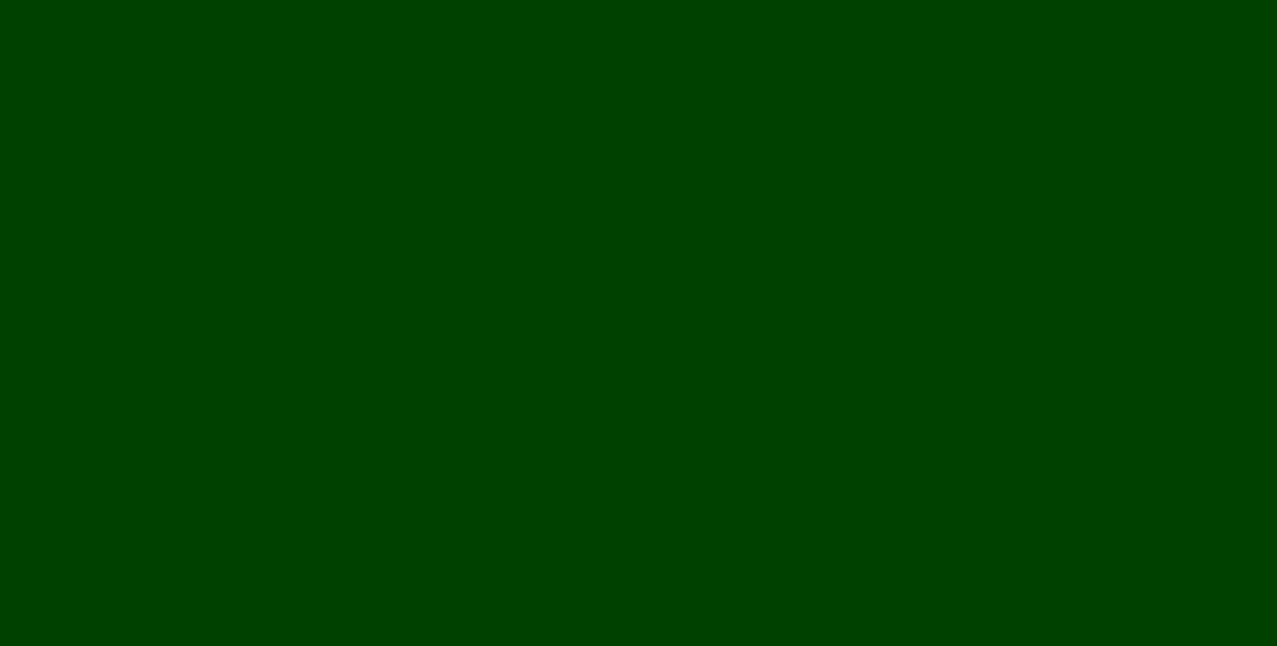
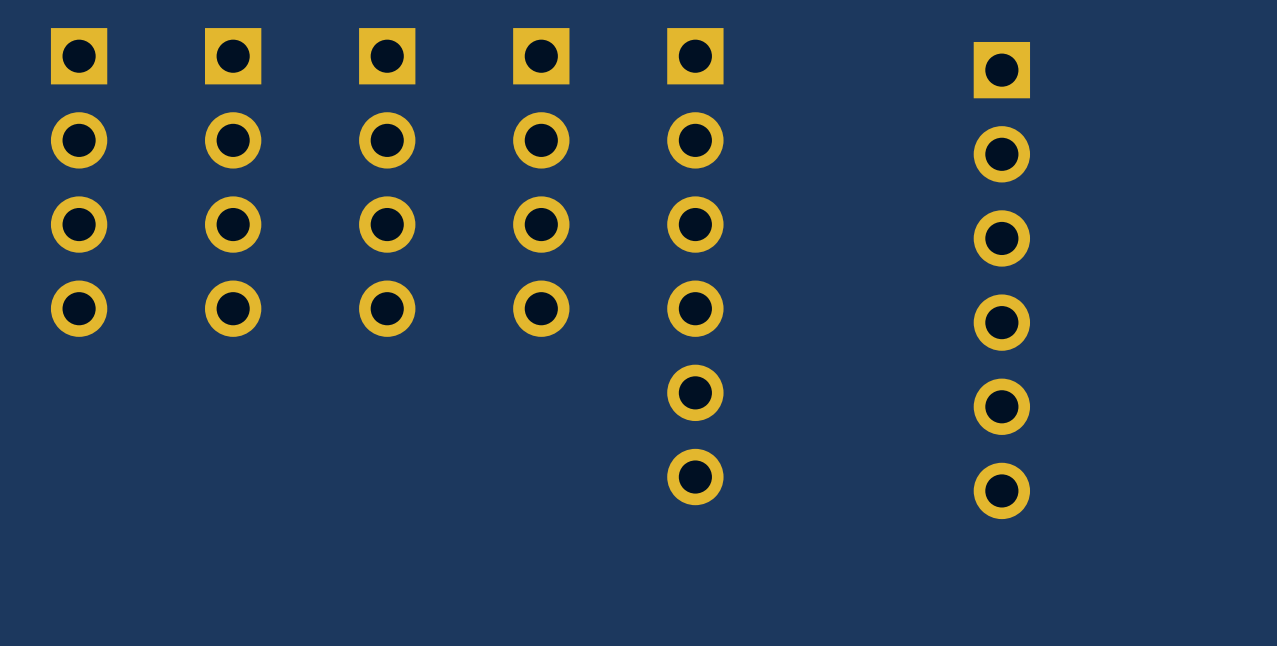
part: none -> (79, 182)
part: none -> (233, 182)
part: none -> (387, 182)
part: none -> (541, 182)
part: none -> (695, 266)
part: none -> (1001, 280)

